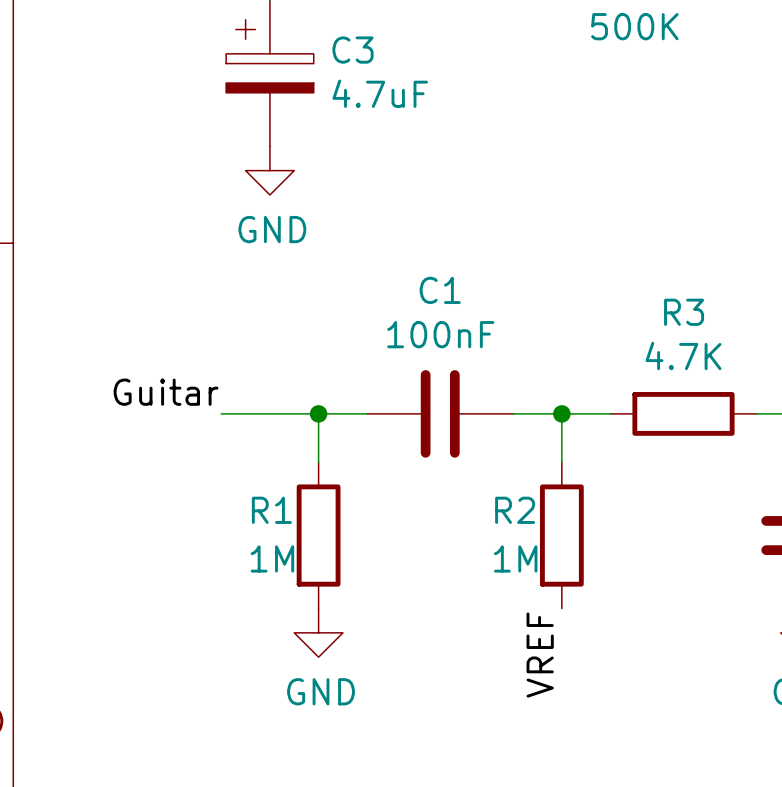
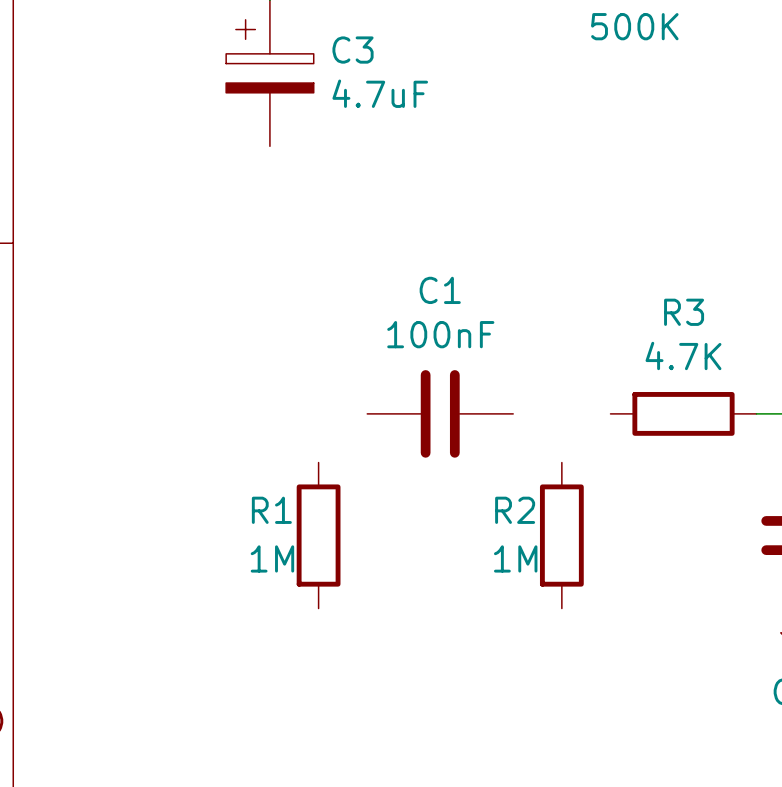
power symbol: GND (269, 170) -> none
label: Guitar (166, 392) -> none
wire: (221, 413) (367, 413) -> none
wire: (318, 413) (318, 462) -> none
junction: (318, 413) -> none
wire: (513, 413) (610, 413) -> none
wire: (561, 413) (561, 462) -> none
junction: (561, 413) -> none
power symbol: GND (318, 632) -> none
label: VREF (540, 655) -> none

